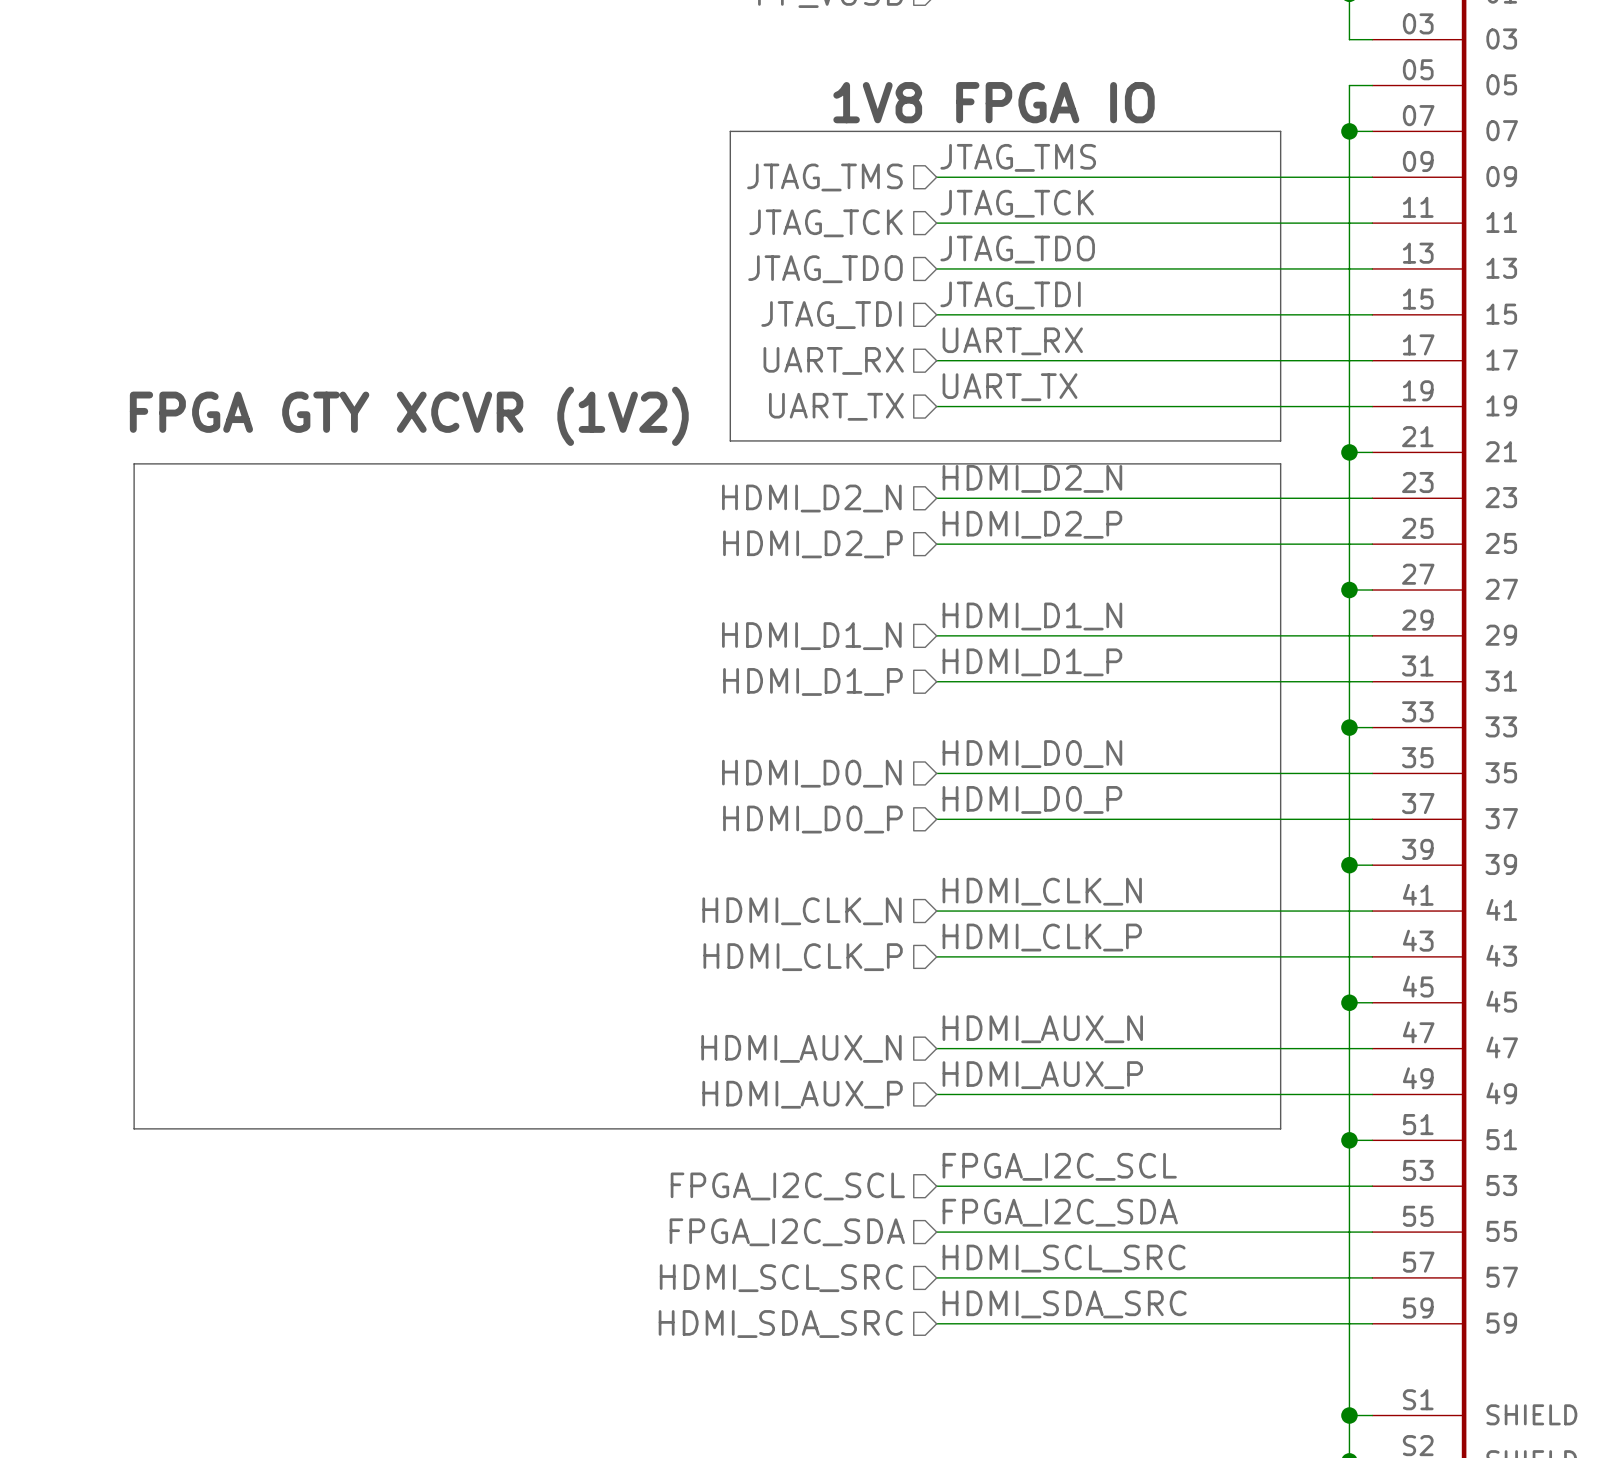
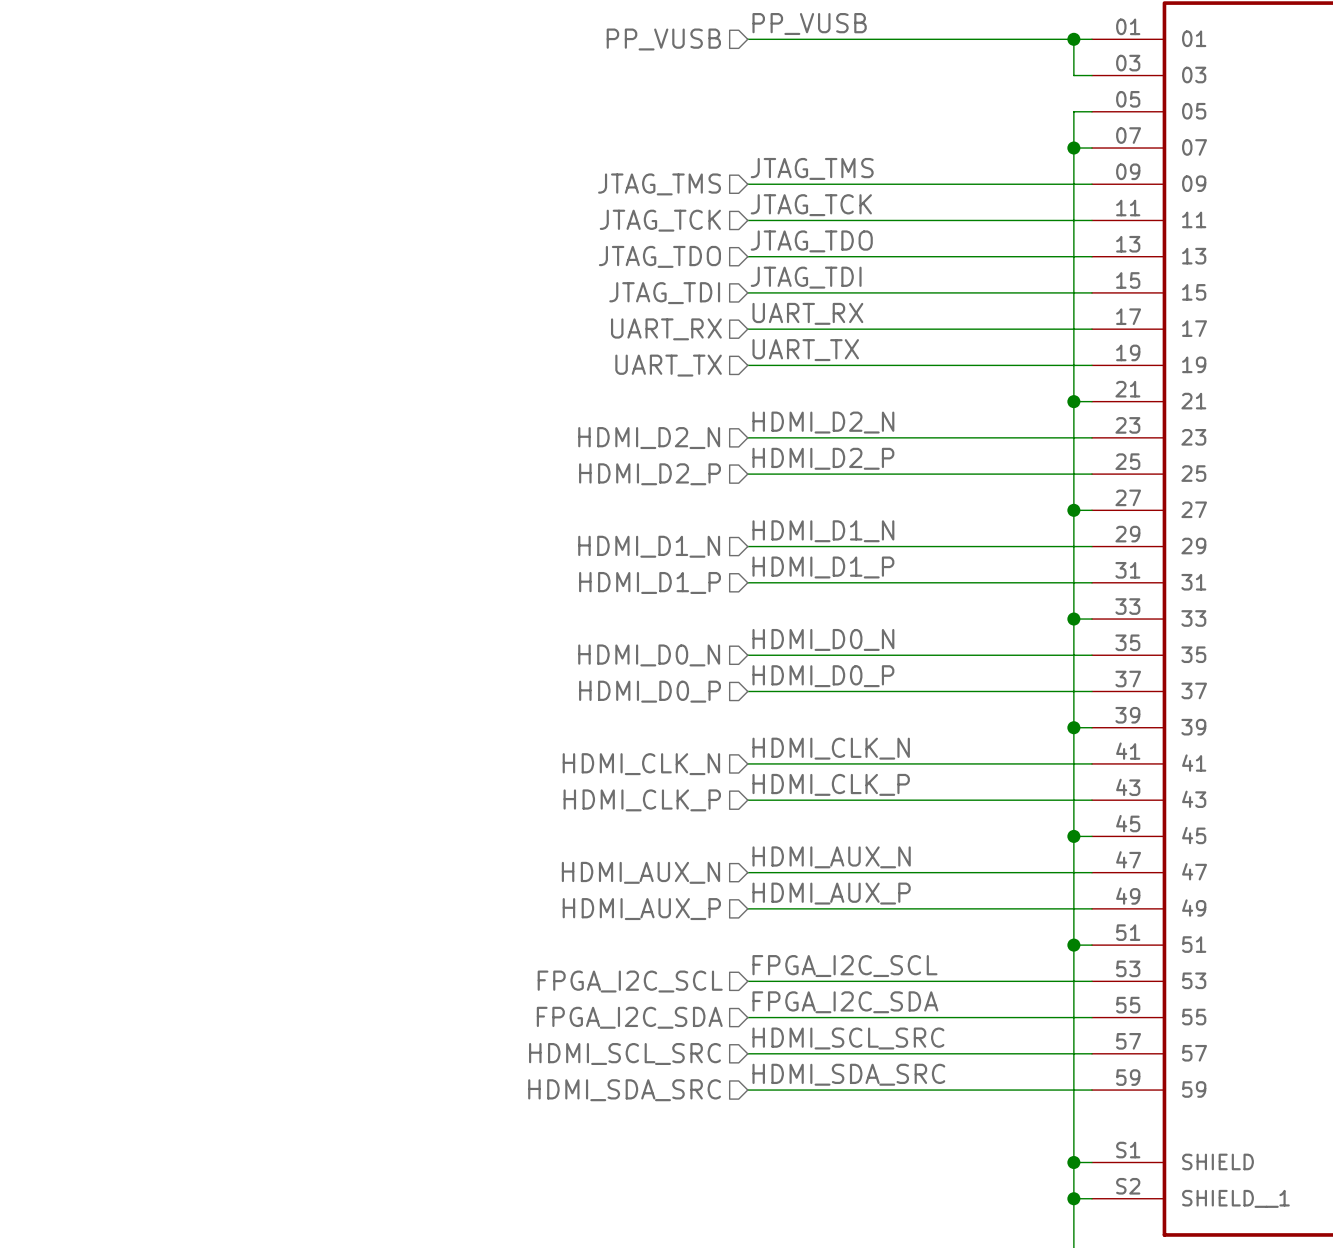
text: 1V8 FPGA IO (994, 102) -> none
line: (730, 131) (1280, 131) (1280, 440) (730, 440) (730, 131) -> none
text: FPGA GTY XCVR (1V2) (409, 416) -> none
line: (134, 463) (1280, 463) (1280, 1128) (134, 1128) (134, 463) -> none

